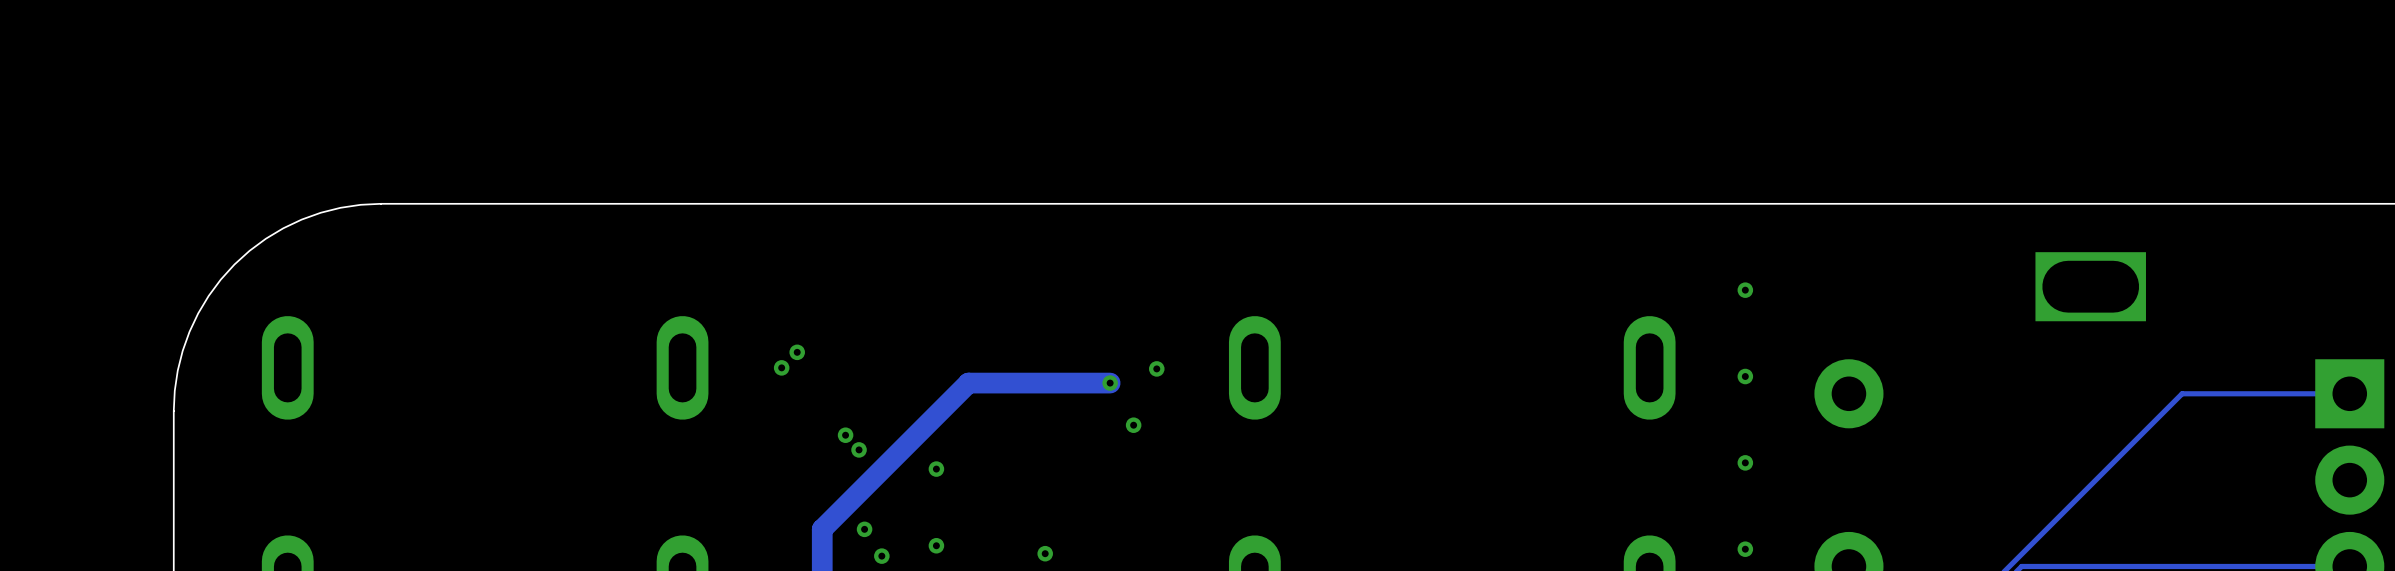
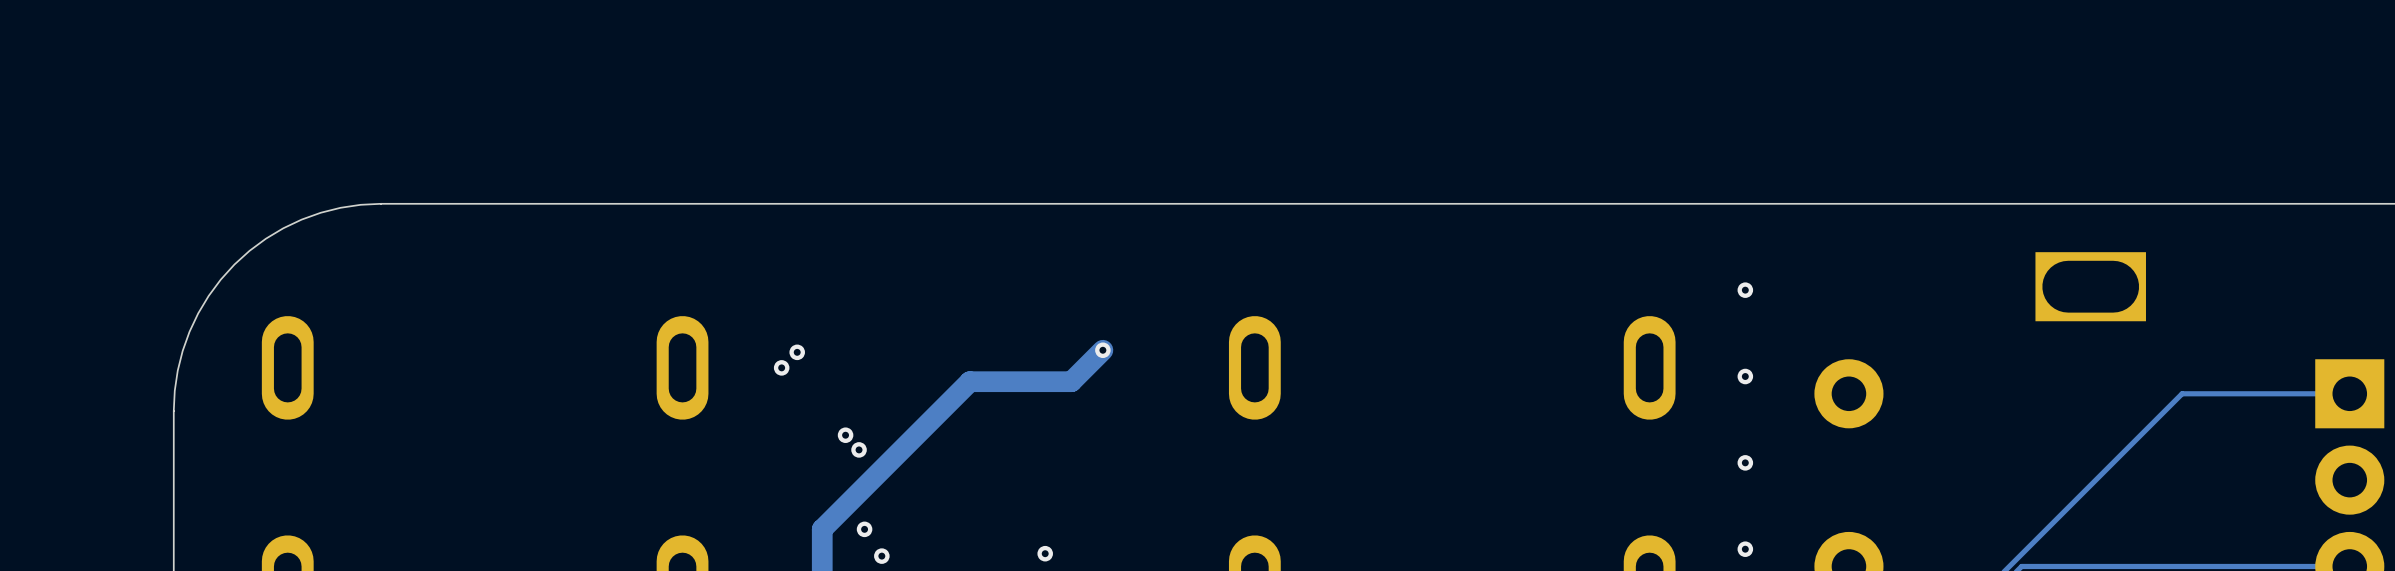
via: none -> (1102, 350)
via: (1156, 368) -> none
track: (1110, 383) (968, 383) -> (1102, 350) (1071, 381) (968, 383)
via: (1110, 383) -> none
via: (1133, 425) -> none
via: (936, 469) -> none
via: (936, 545) -> none

